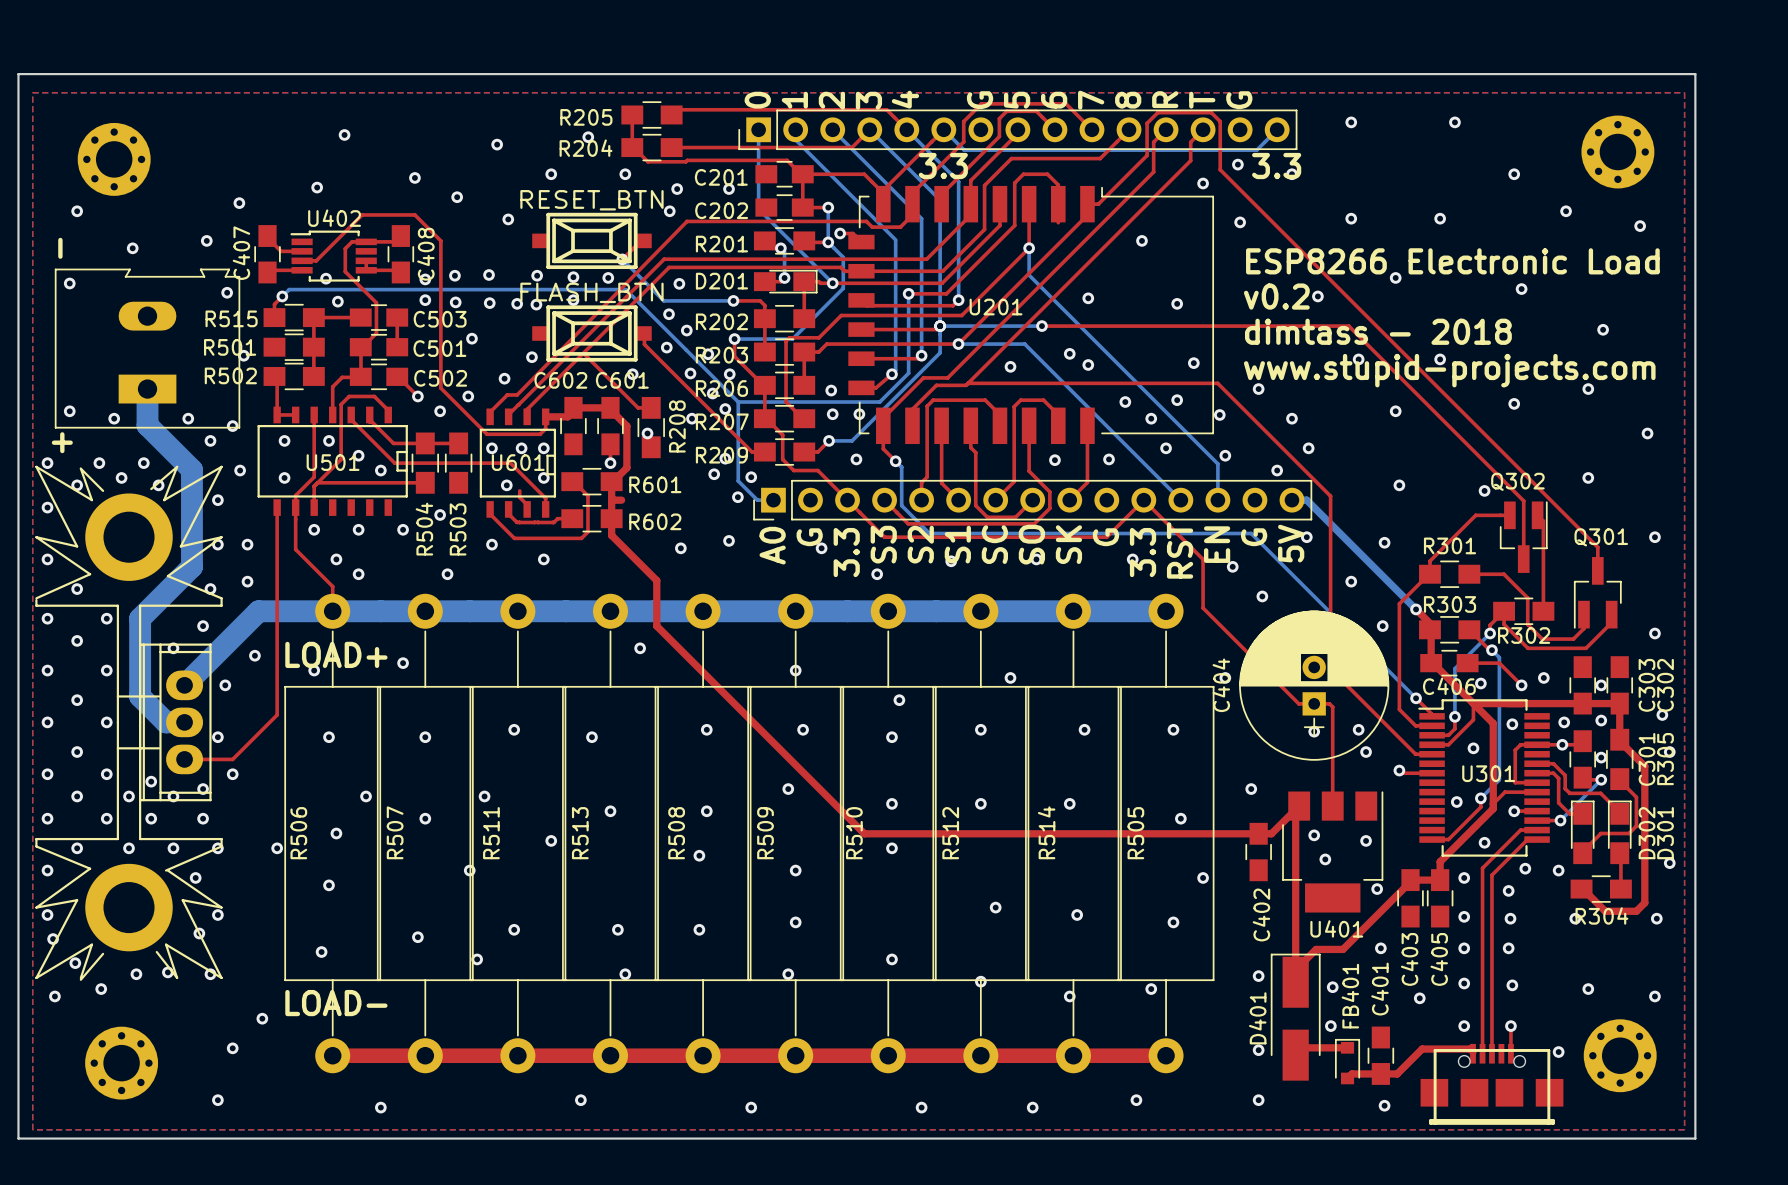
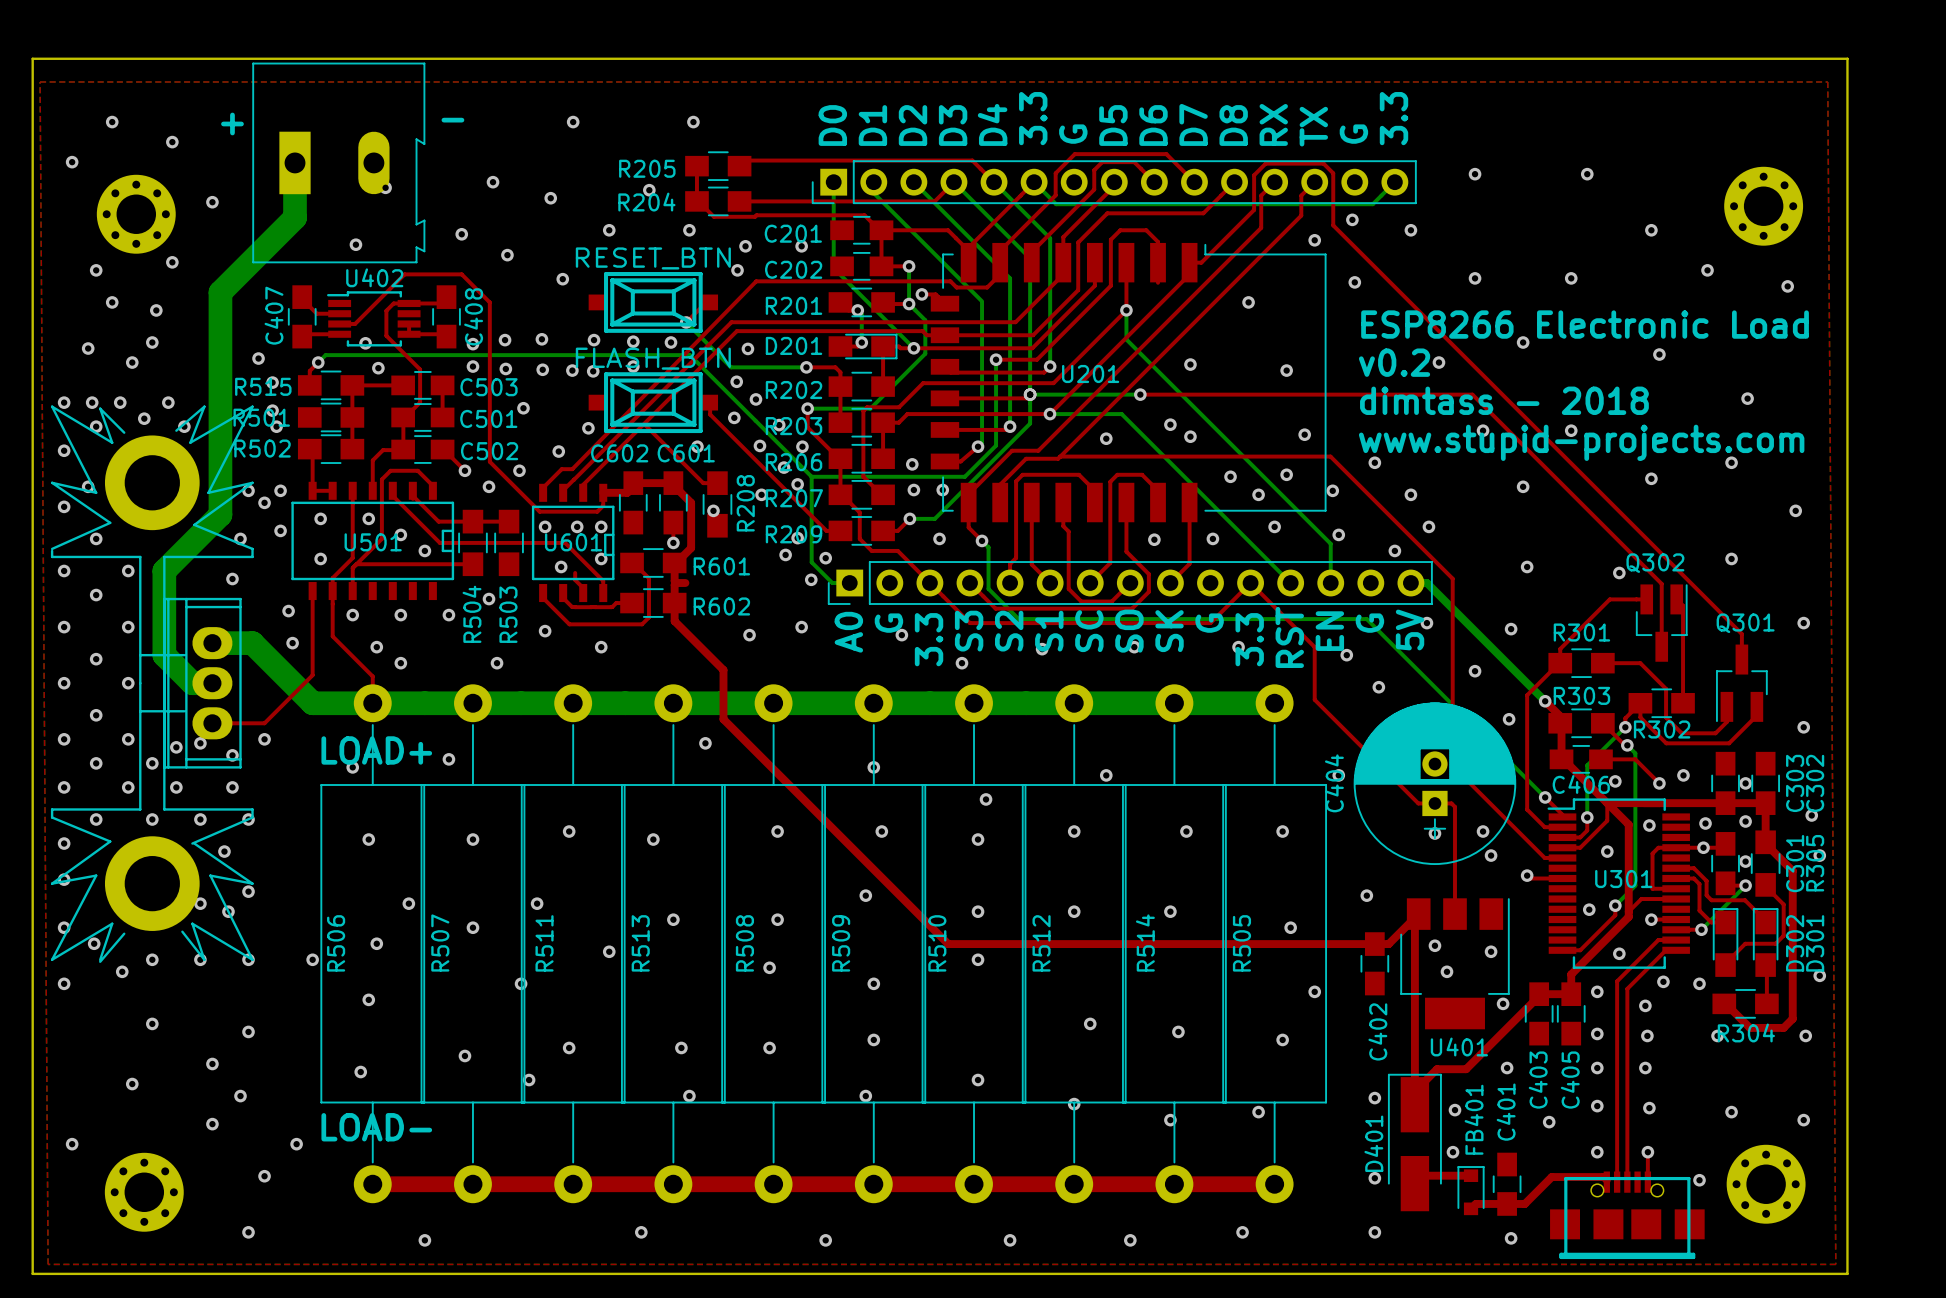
text: none -> - (452, 120)
board edge: (18, 74) (1695, 74) -> (32, 121) (32, 58) (1847, 58) (1847, 121)
via: none -> (112, 122)
via: none -> (573, 122)
via: none -> (693, 122)
text: none -> + (232, 123)
via: none -> (172, 142)
text: 4 (905, 99) -> D4 (992, 124)
text: R (1165, 99) -> RX (1273, 124)
text: 0 (757, 100) -> D0 (832, 125)
text: 1 (794, 100) -> D1 (872, 125)
text: 2 (831, 100) -> D2 (913, 125)
text: 3 (868, 100) -> D3 (953, 125)
text position: G (980, 100) -> G (1073, 134)
text: 5 (1017, 100) -> D5 (1113, 125)
text: 6 (1054, 100) -> D6 (1153, 125)
text: 7 (1091, 100) -> D7 (1193, 124)
text: 8 (1128, 100) -> D8 (1233, 125)
text: T (1202, 100) -> TX (1313, 126)
text position: G (1239, 100) -> G (1353, 134)
via: none -> (72, 162)
bottom track: none -> (295, 162) (295, 217) (220, 292) (220, 514) (164, 570) (164, 655) (192, 683) (212, 683)
via: none -> (493, 182)
via: none -> (212, 202)
text rotation: 0° (943, 166) -> 90° counterclockwise (1033, 118)
text position: 3.3 (943, 166) -> 3.3 (1033, 118)
text rotation: 0° (1276, 166) -> 90° counterclockwise (1393, 118)
text position: 3.3 (1276, 166) -> 3.3 (1393, 118)
via: none -> (172, 262)
via: (239, 203) -> none
via: none -> (112, 302)
via: (206, 240) -> none
text: - (60, 248) -> none
via: none -> (152, 342)
via: none -> (132, 362)
via: none -> (272, 382)
via: none -> (64, 402)
via: none -> (92, 402)
via: none -> (120, 402)
via: none -> (168, 402)
via: none -> (272, 410)
via: none -> (144, 418)
part rotation: 0° (147, 348) -> 90° clockwise (338, 162)
part position: (147, 348) -> (338, 162)
via: none -> (96, 426)
via: none -> (184, 426)
via: none -> (64, 450)
bottom track: (147, 389) (147, 425) (191, 469) (191, 566) (140, 618) (140, 696) (166, 722) (184, 722) -> none
via: none -> (248, 490)
via: none -> (280, 490)
via: (114, 418) -> none
via: (188, 418) -> none
via: none -> (64, 506)
via: (210, 440) -> none
text: + (62, 442) -> none
via: none -> (280, 530)
via: none -> (96, 538)
via: none -> (240, 538)
via: (47, 463) -> none
via: (99, 463) -> none
via: (143, 463) -> none
via: (240, 470) -> none
via: (121, 477) -> none
via: (77, 485) -> none
via: (158, 485) -> none
via: none -> (64, 570)
via: none -> (128, 570)
via position: (217, 500) -> (232, 579)
via: (47, 507) -> none
via: none -> (96, 595)
via: none -> (288, 611)
via: none -> (64, 627)
via: none -> (128, 627)
via: (217, 544) -> none
via: (247, 544) -> none
via: none -> (292, 643)
via: (47, 559) -> none
via: none -> (96, 659)
via: (247, 581) -> none
top track: (277, 585) (277, 714) (232, 759) (184, 759) -> (312, 675) (264, 723) (212, 723)
via: (77, 589) -> none
via: (210, 589) -> none
via: none -> (64, 683)
via: none -> (128, 683)
bottom track: (277, 611) (258, 611) (184, 685) -> (312, 703) (252, 643) (212, 643)
via: (47, 618) -> none
via: (106, 618) -> none
via: none -> (96, 715)
via: (203, 626) -> none
via: (77, 640) -> none
via: none -> (64, 739)
via: none -> (128, 739)
via: none -> (264, 739)
via: none -> (176, 747)
via: (254, 655) -> none
via: none -> (232, 755)
via: none -> (96, 763)
via: none -> (152, 763)
via: (47, 670) -> none
via: (106, 670) -> none
via: (225, 685) -> none
via: none -> (64, 787)
via: none -> (128, 787)
via: none -> (176, 787)
via: none -> (232, 787)
via: (77, 700) -> none
via: none -> (96, 819)
via: none -> (152, 819)
via: none -> (200, 819)
via: none -> (248, 819)
via: (47, 722) -> none
via: (106, 722) -> none
part position: (175, 722) -> (202, 683)
part position: (129, 723) -> (152, 684)
via: (217, 737) -> none
via: none -> (64, 843)
via: none -> (224, 851)
via: (77, 752) -> none
via: (106, 774) -> none
via: (232, 774) -> none
via: (151, 781) -> none
via: none -> (248, 891)
via: (203, 789) -> none
via: (77, 796) -> none
via: (129, 796) -> none
via: none -> (228, 911)
via: (106, 818) -> none
via: (151, 818) -> none
via: (203, 818) -> none
via: none -> (94, 943)
via: (77, 848) -> none
via: none -> (122, 971)
via: (195, 877) -> none
via: none -> (152, 1023)
via: (47, 914) -> none
via: (199, 933) -> none
via: (53, 939) -> none
via: none -> (212, 1064)
via: (75, 963) -> none
via: none -> (132, 1084)
via: (167, 972) -> none
via: (136, 974) -> none
via: (101, 989) -> none
via position: (54, 996) -> (72, 1144)
via: none -> (212, 1124)
top zone outline: (32, 1129) (32, 92) (1684, 92) (1684, 1129) -> (48, 1264) (40, 81) (1827, 81) (1835, 1264)

